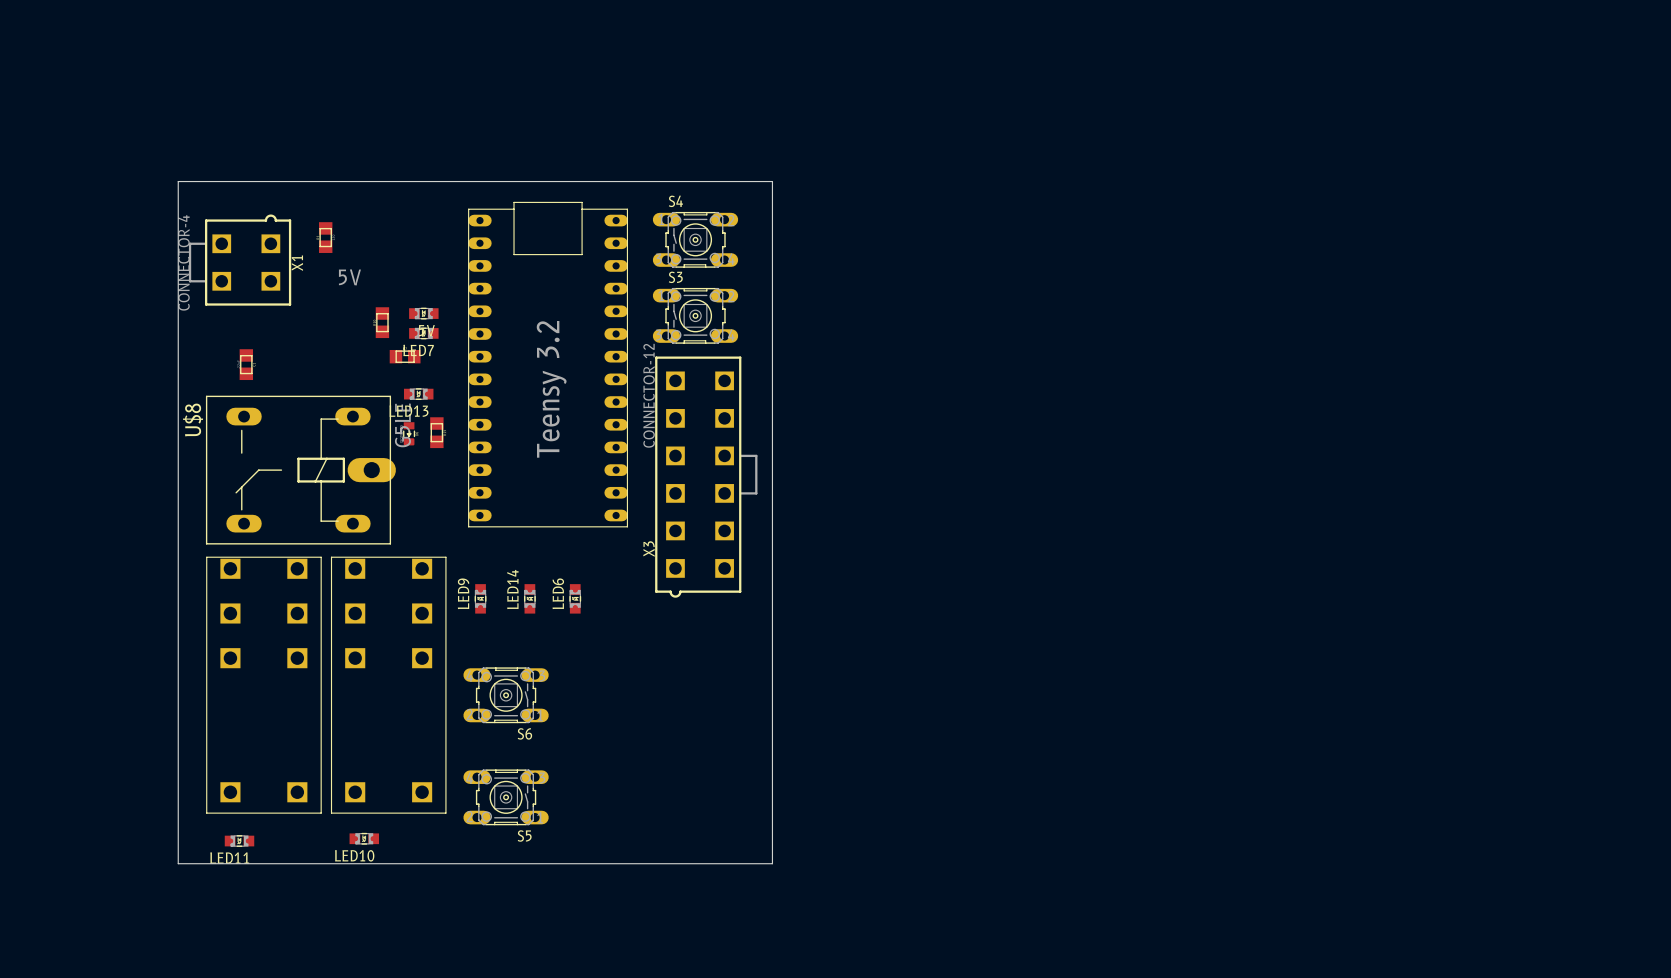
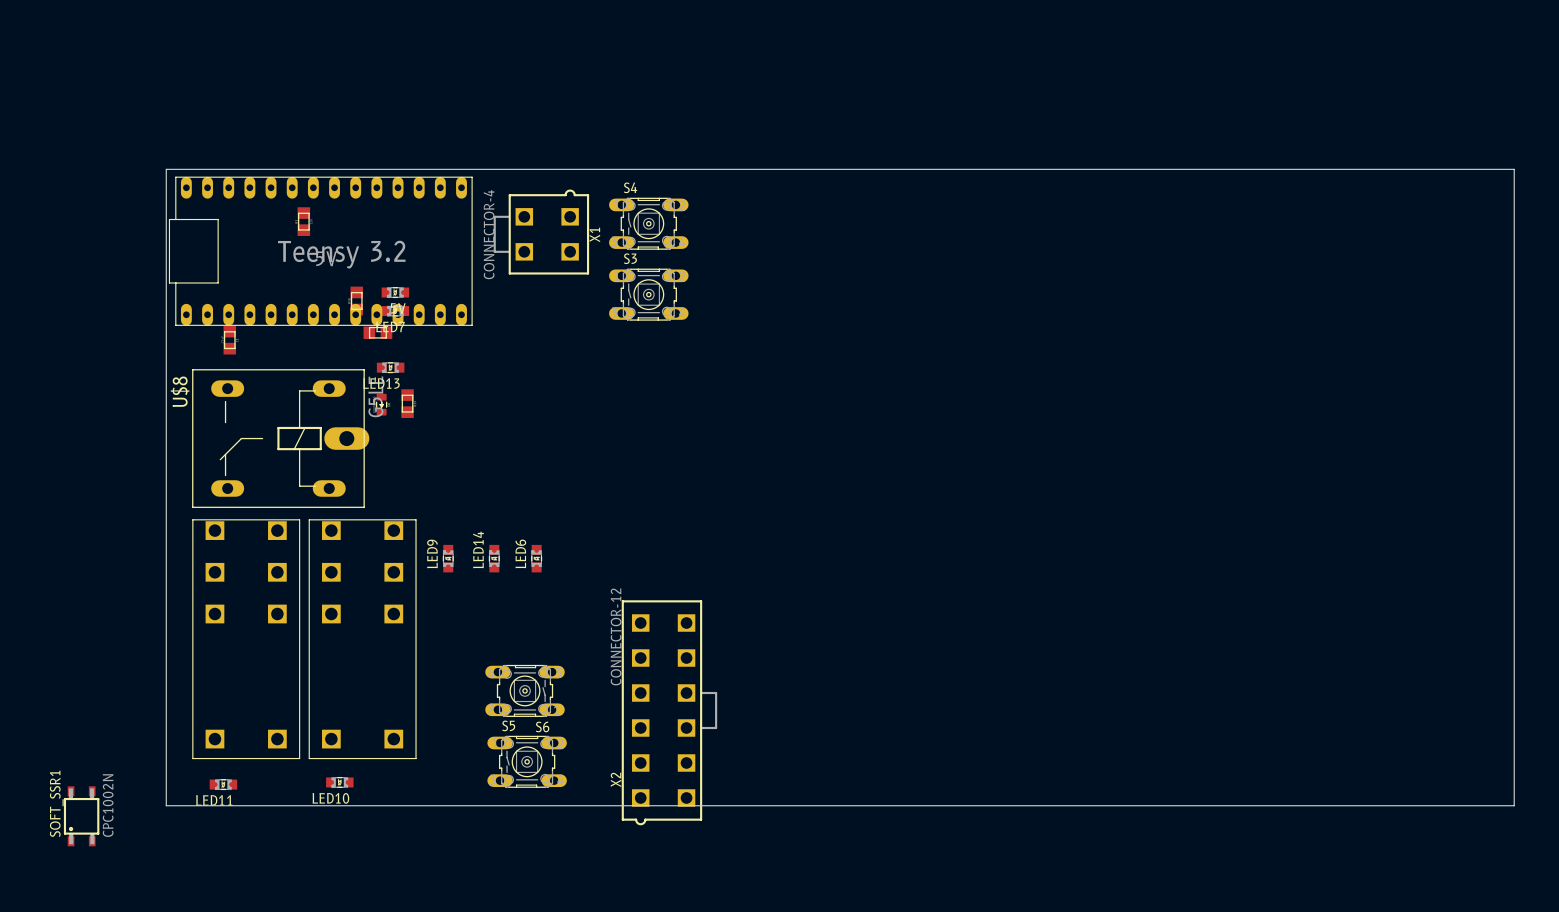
board edge: (772, 181) (772, 863) -> (720, 169) (1514, 169) (1514, 805) (720, 805)
X1 position: (240, 260) -> (541, 232)
part: none -> (320, 251)
part: (548, 364) -> none
X3: CONNECTOR-12 (706, 477) -> none
S6 position: (506, 695) -> (525, 690)
X2: none -> CONNECTOR-12 (669, 712)
S5 footprint: [463, 769, 549, 826] -> [487, 735, 567, 788]
S5 name position: S5 (524, 836) -> S5 (508, 725)
SOFT_SSR1: none -> CPC1002N (81, 816)

